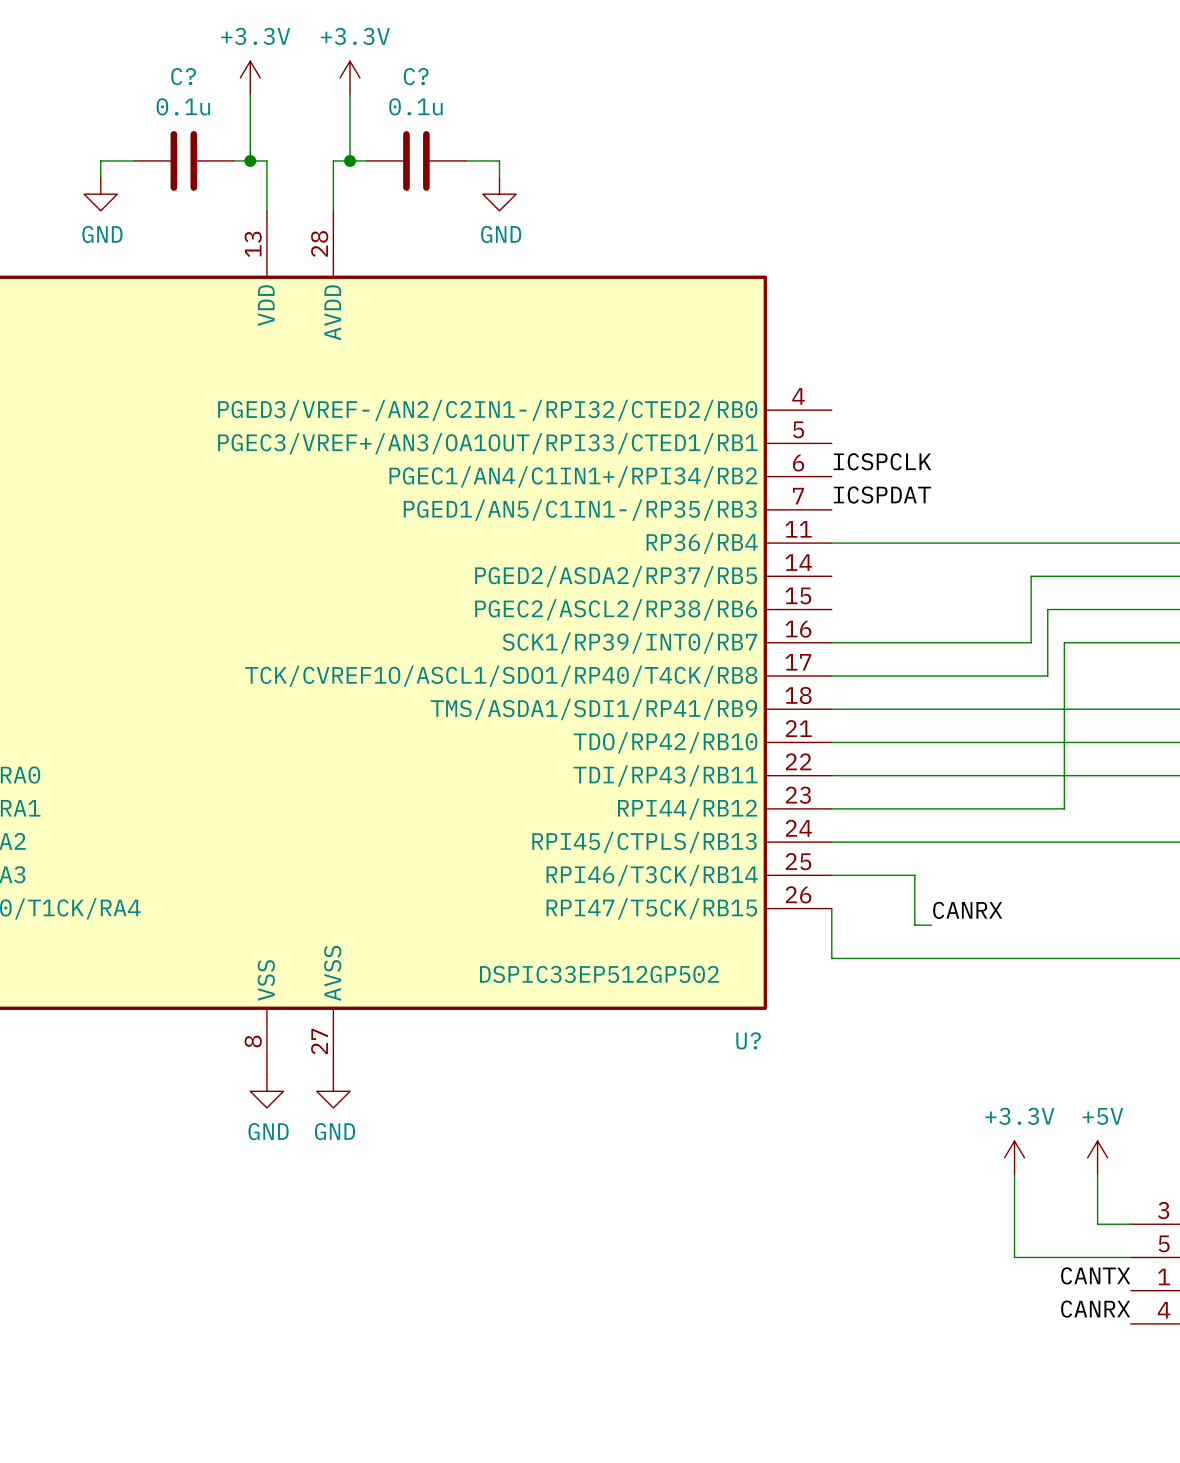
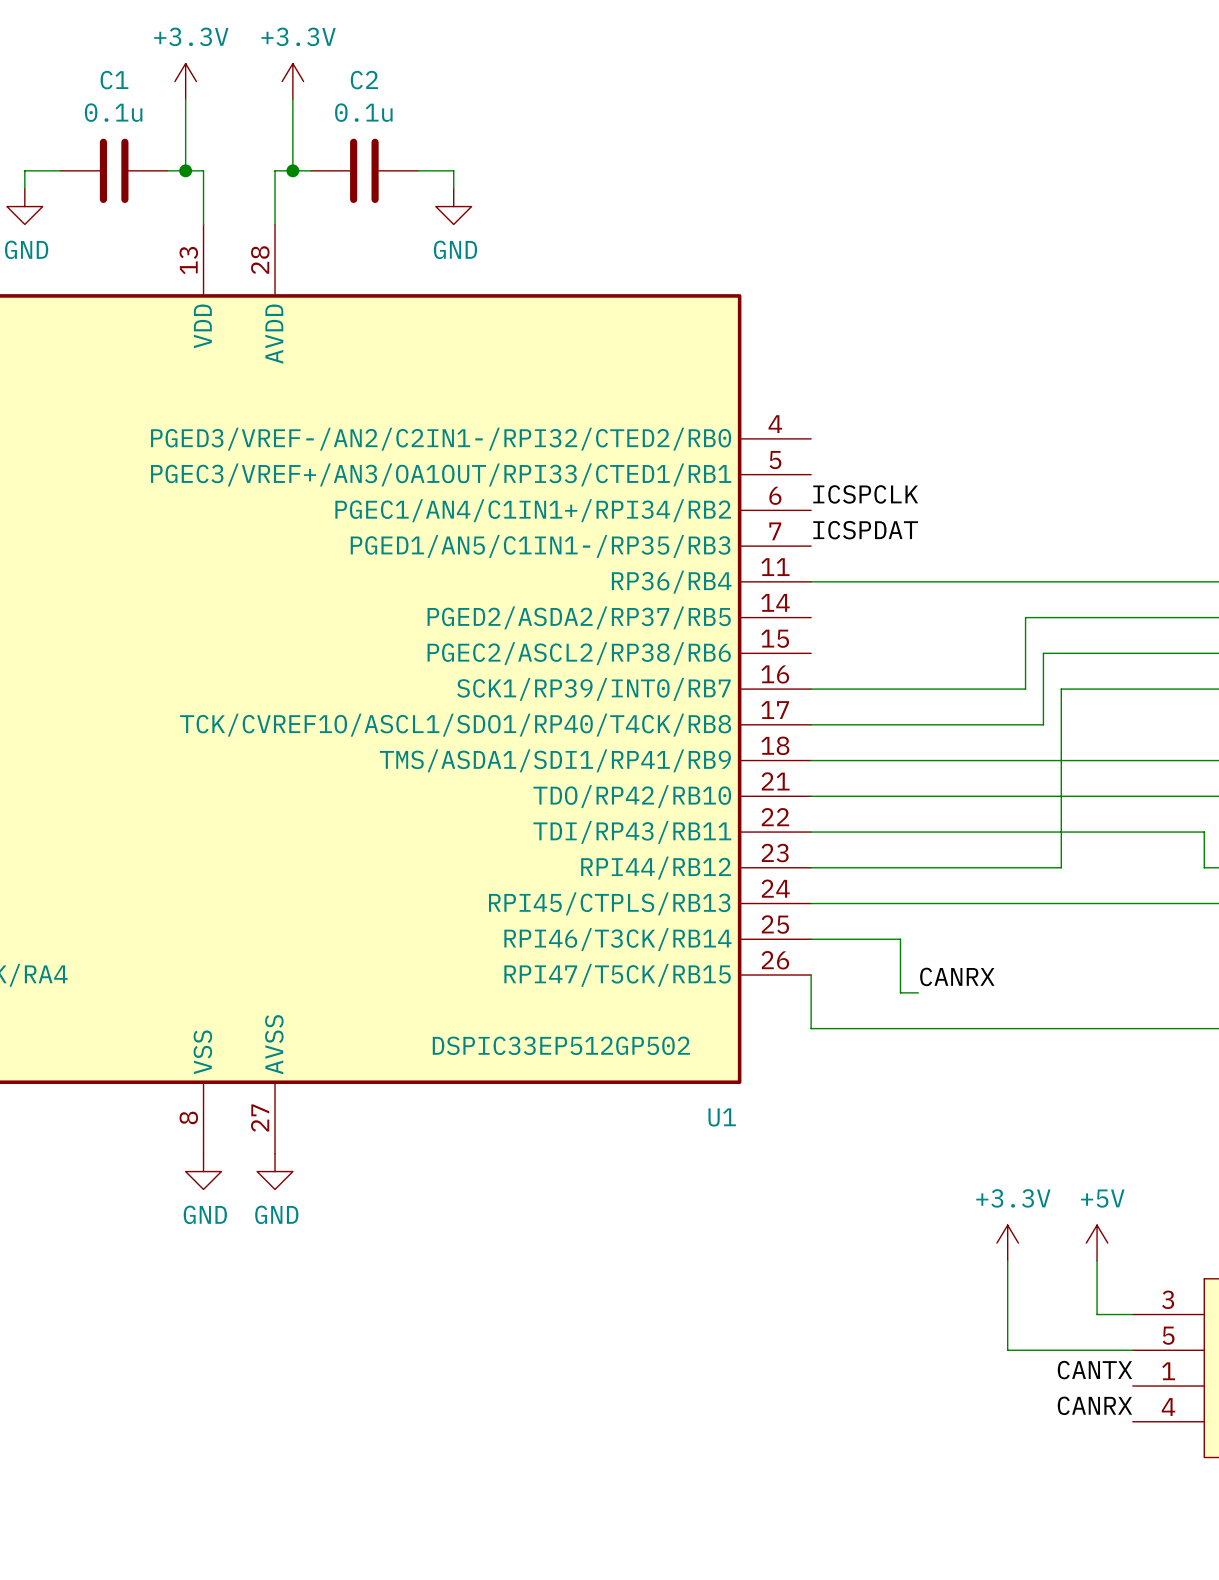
C? name: C? (183, 76) -> C1 (114, 80)
C? name: C? (416, 76) -> C2 (364, 80)
U? name: U? (748, 1040) -> U1 (722, 1117)

